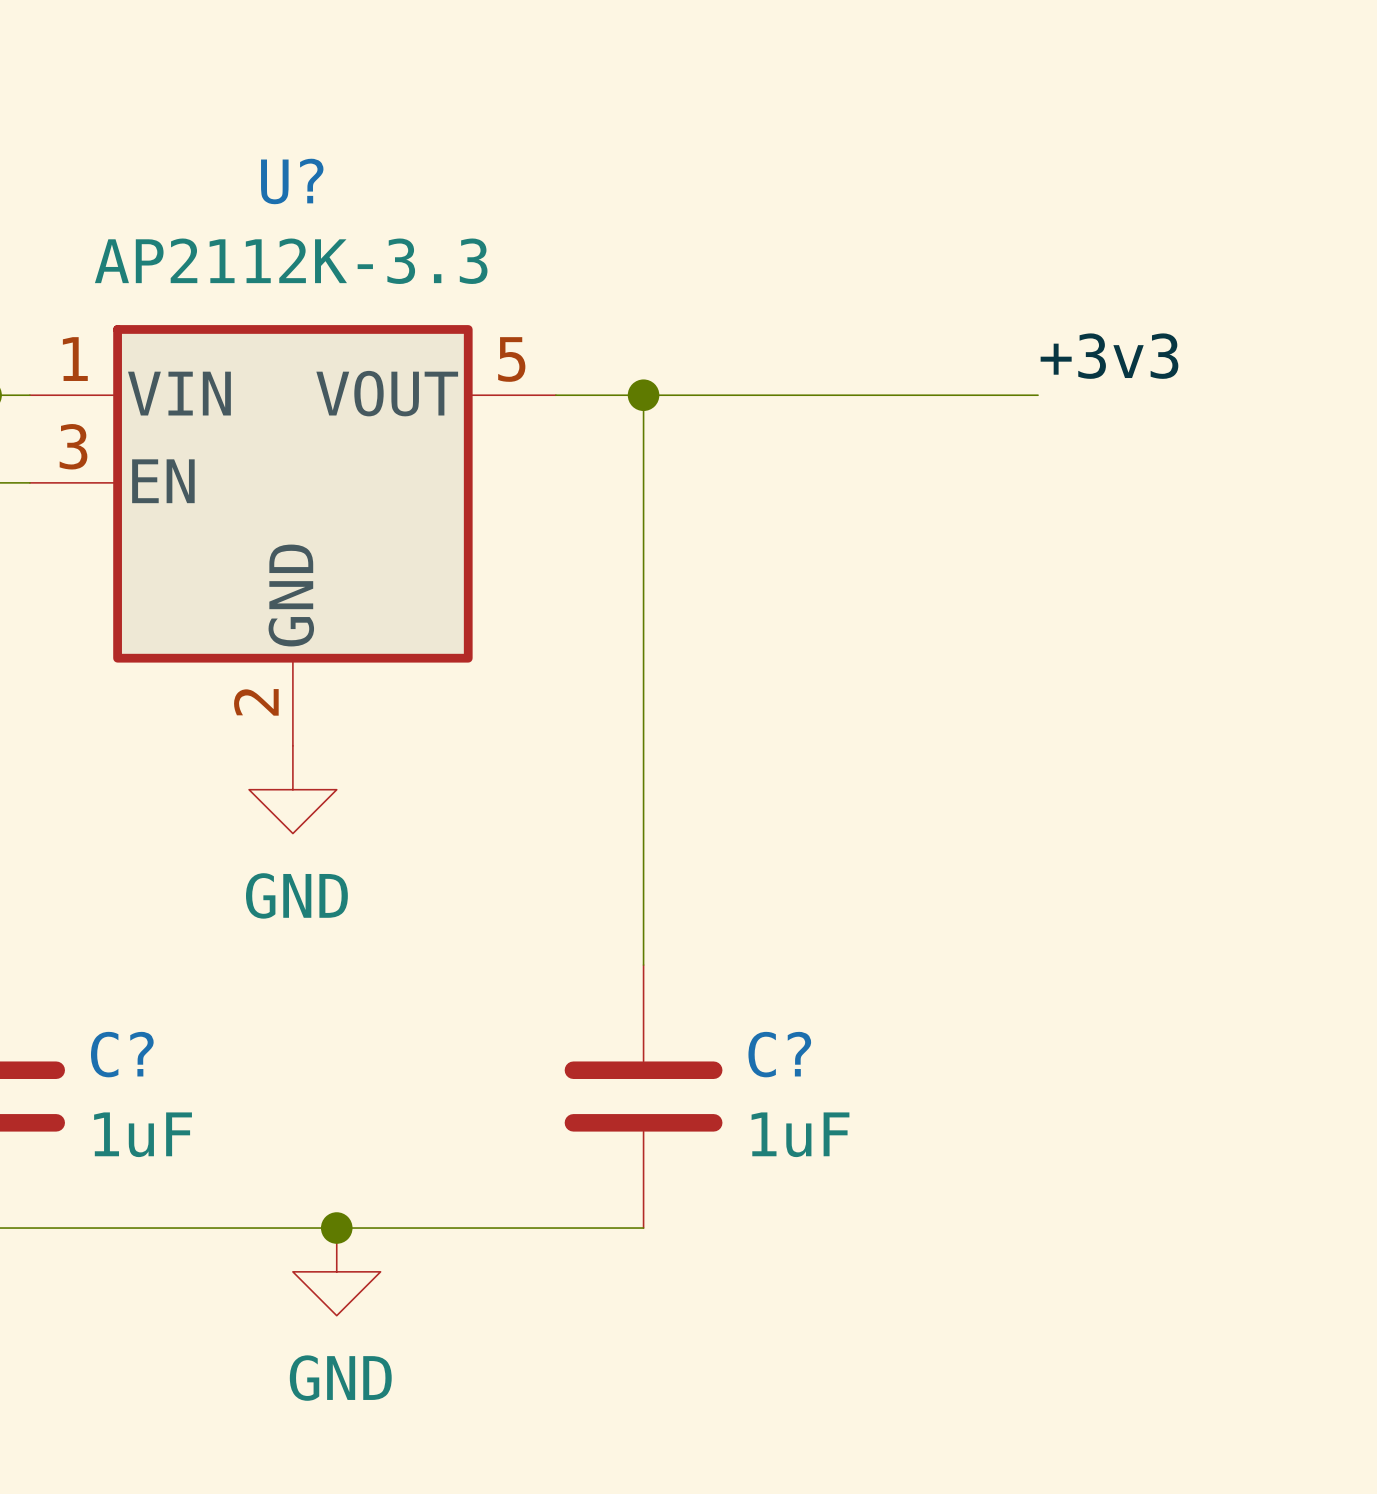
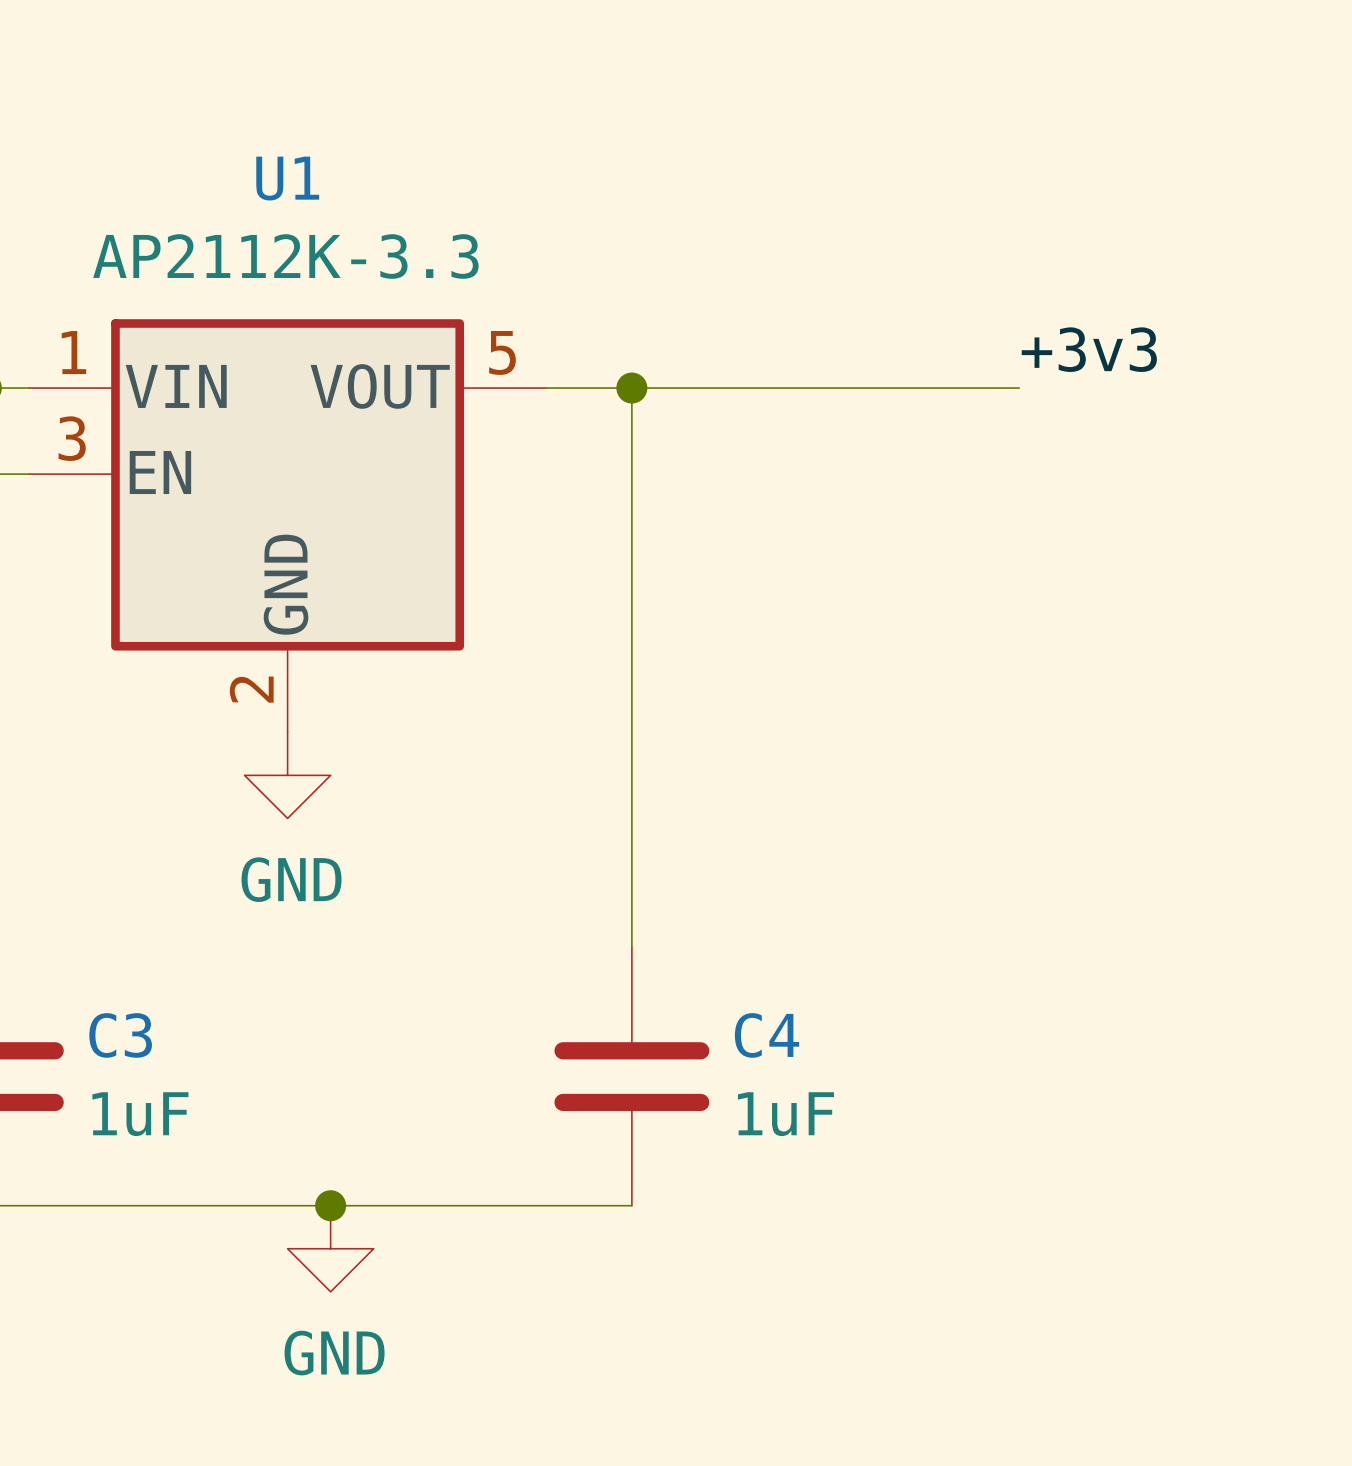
U? name: U? (292, 181) -> U1 (287, 178)
C? name: C? (122, 1054) -> C3 (120, 1035)
C? name: C? (779, 1054) -> C4 (766, 1035)

